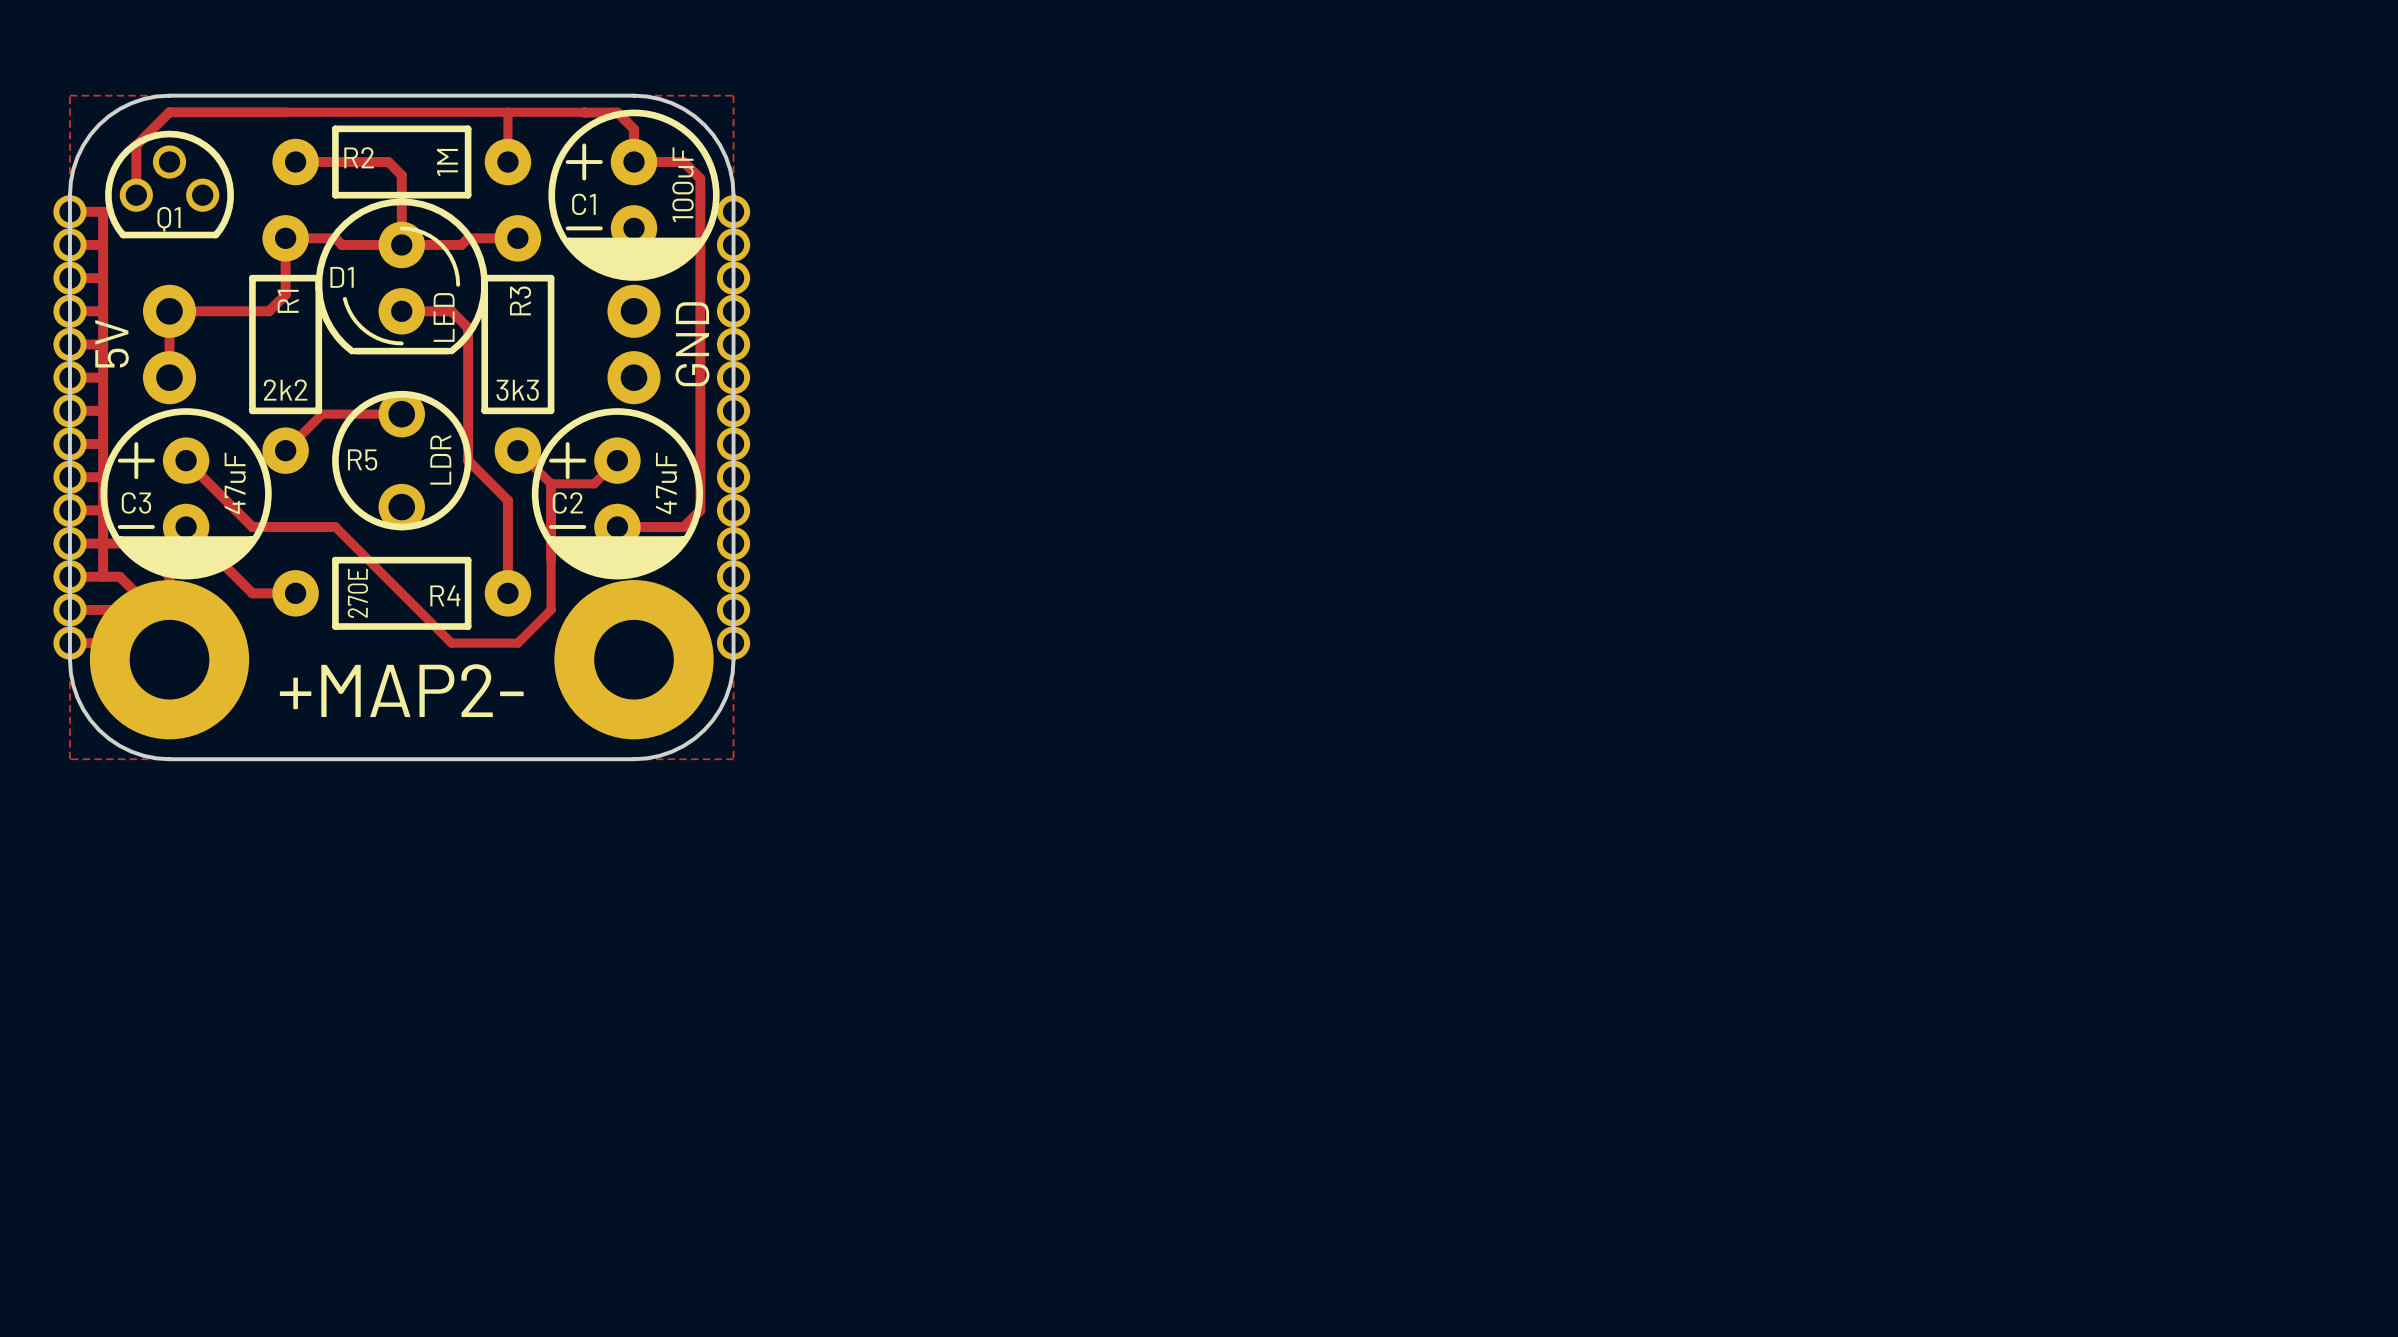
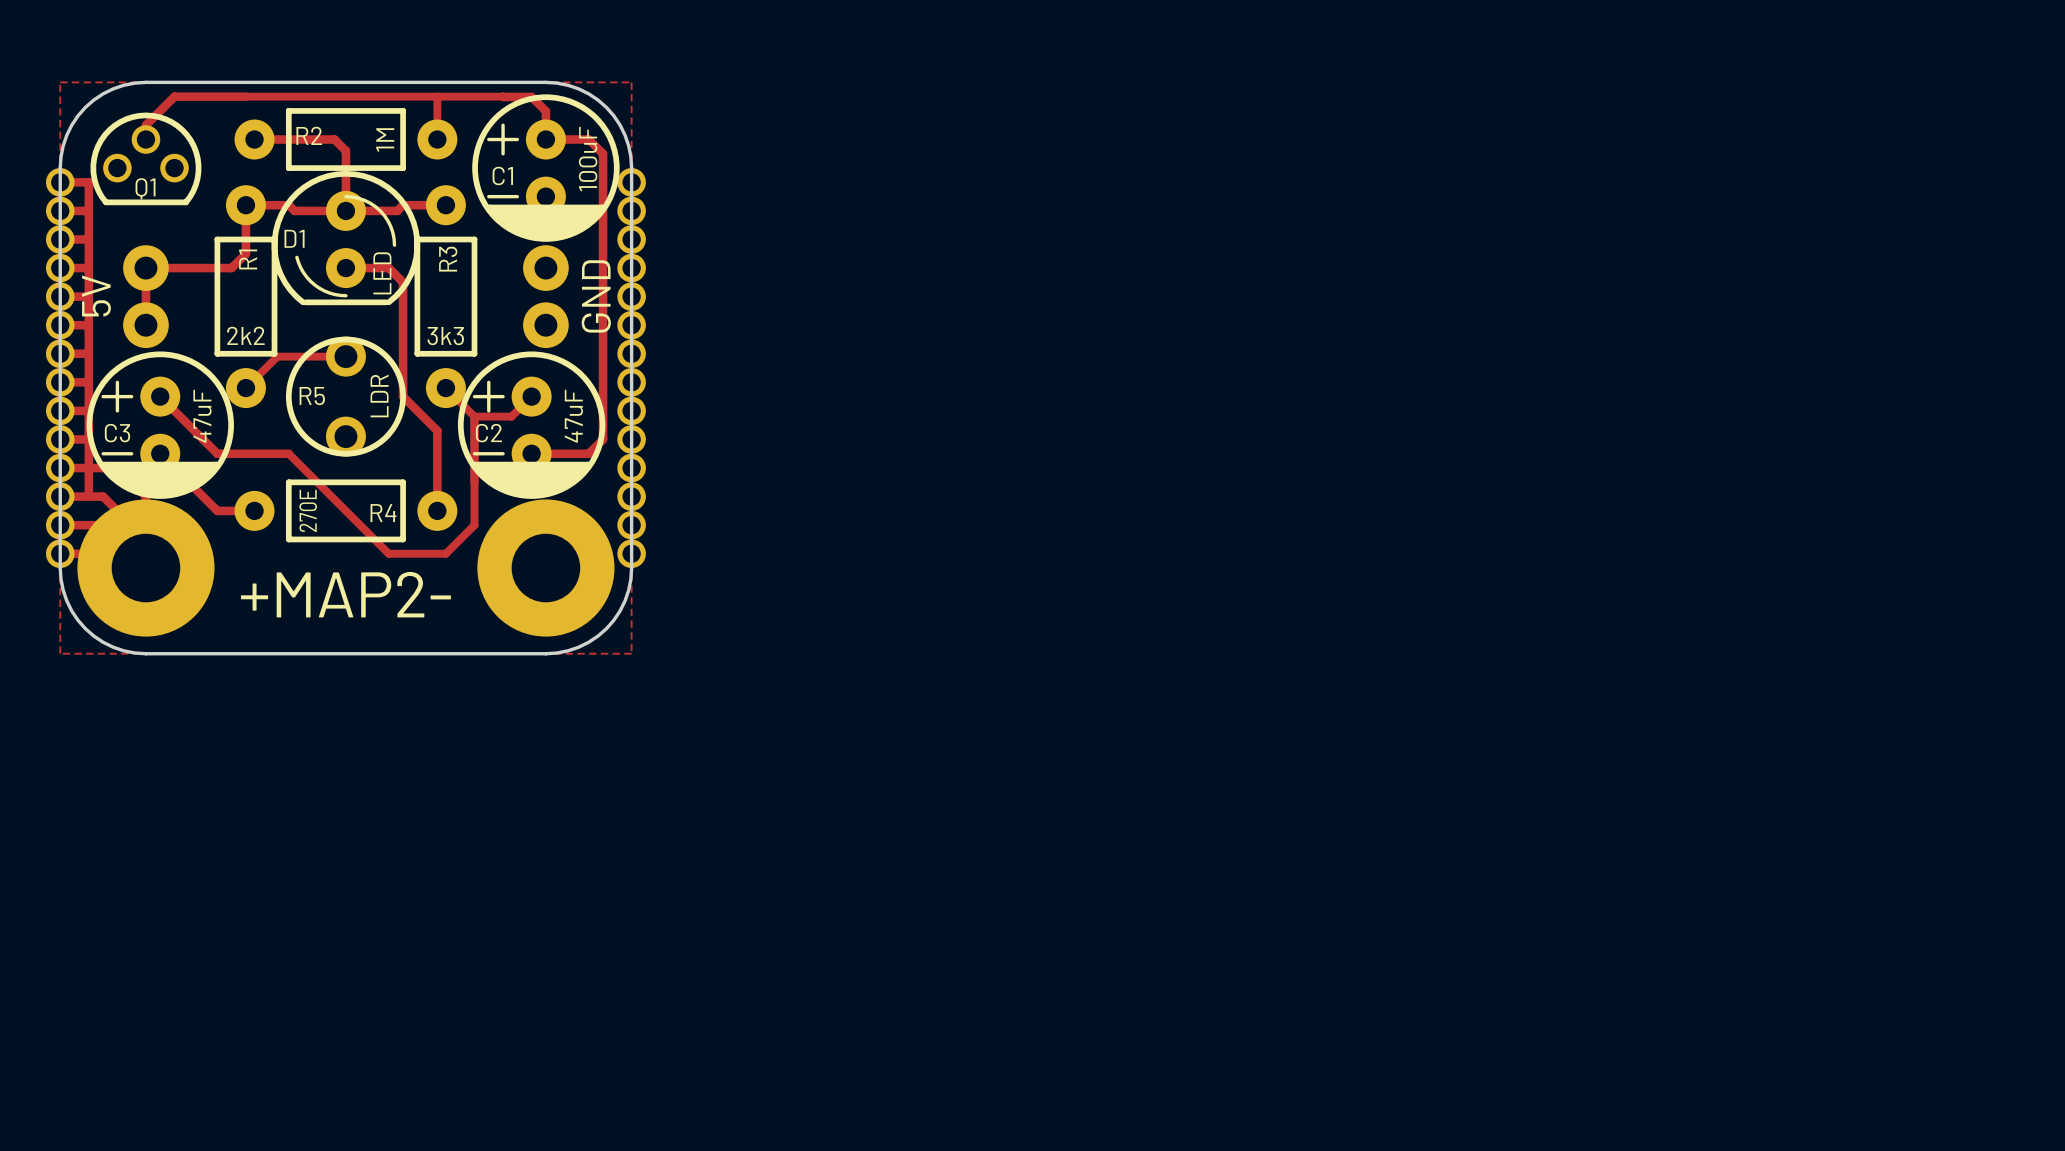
track: (202, 112) (169, 112) (136, 145) (136, 195) -> (174, 96) (145, 125) (145, 139)

